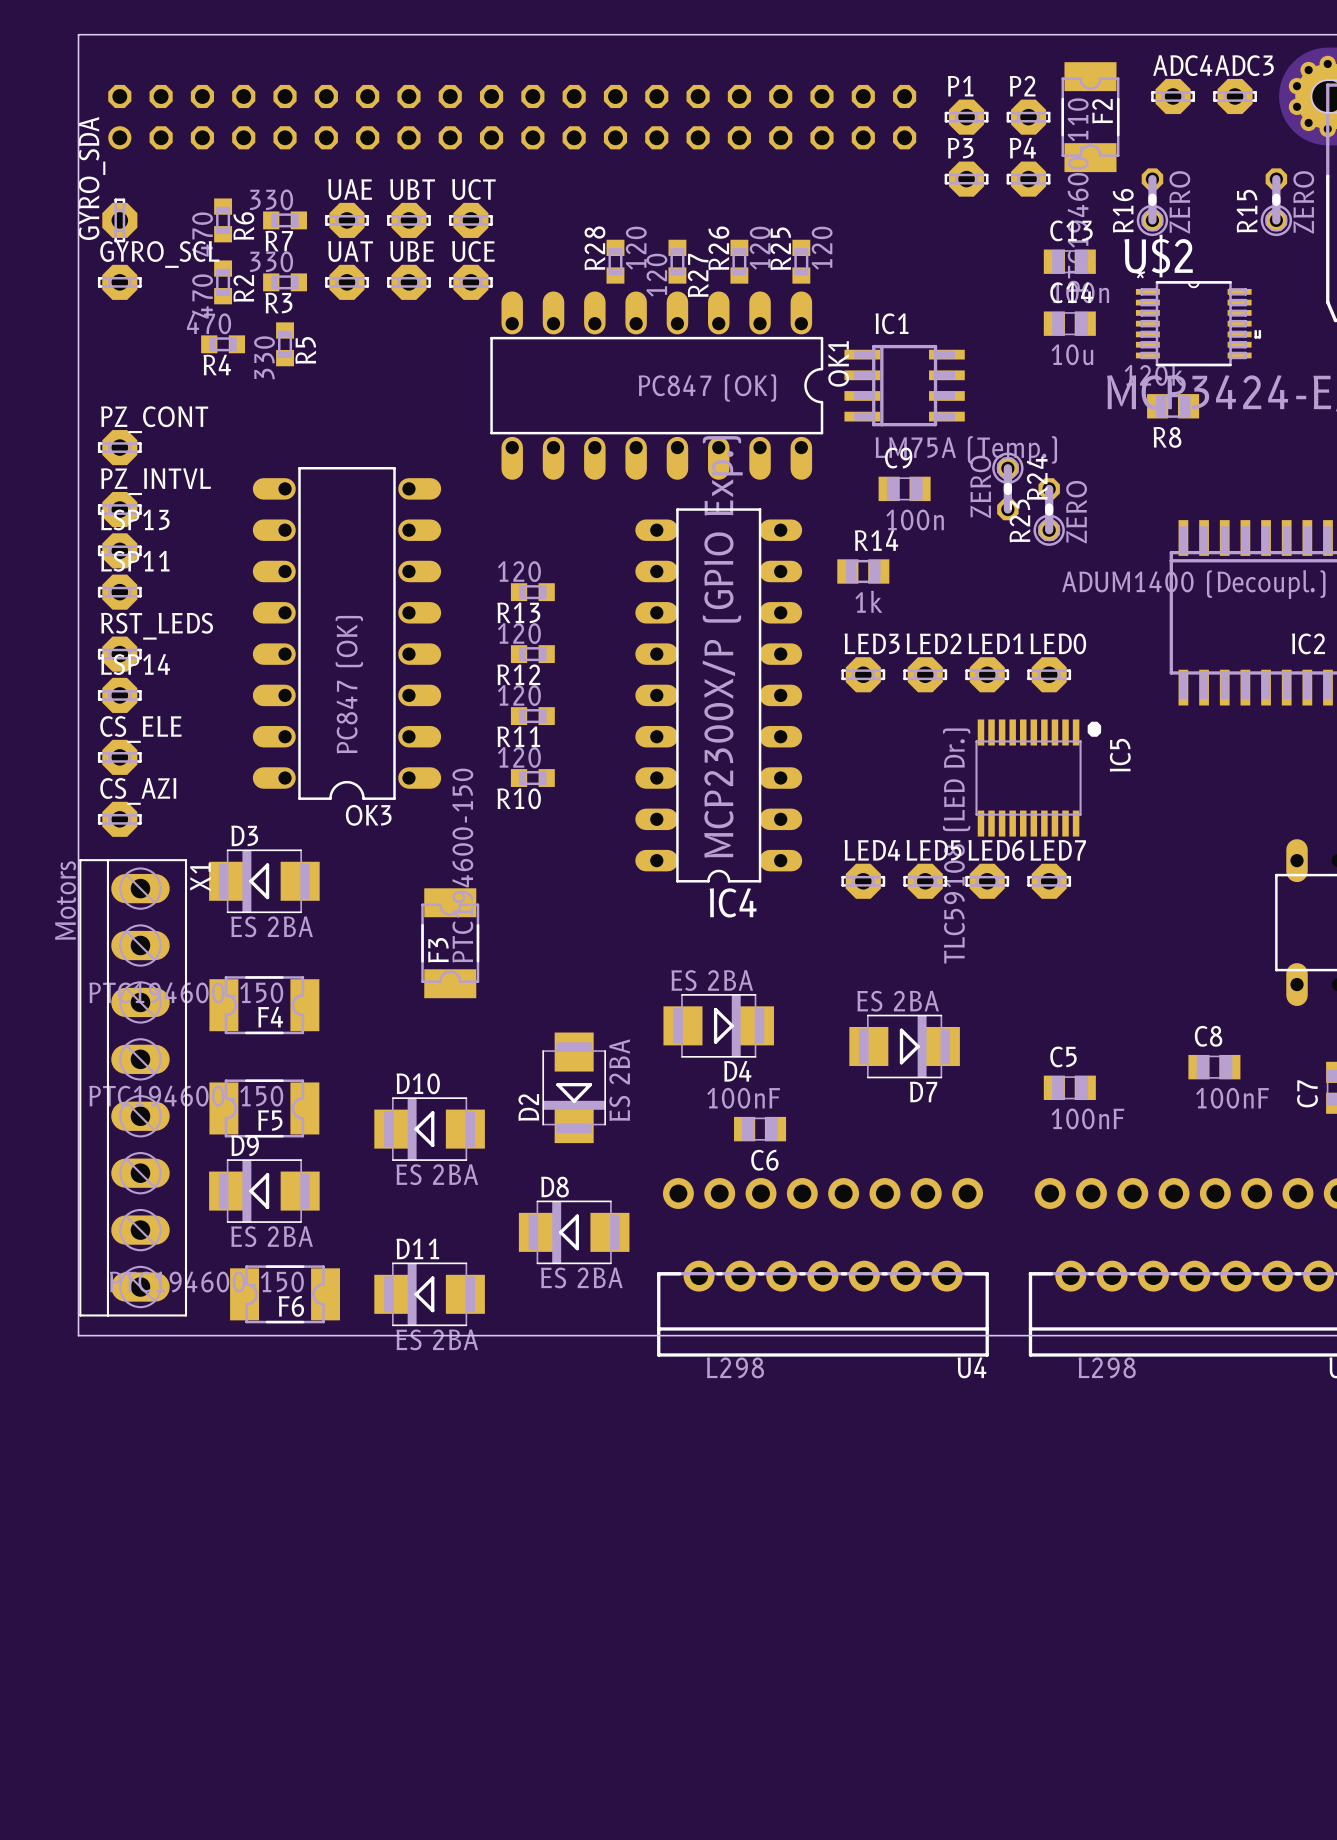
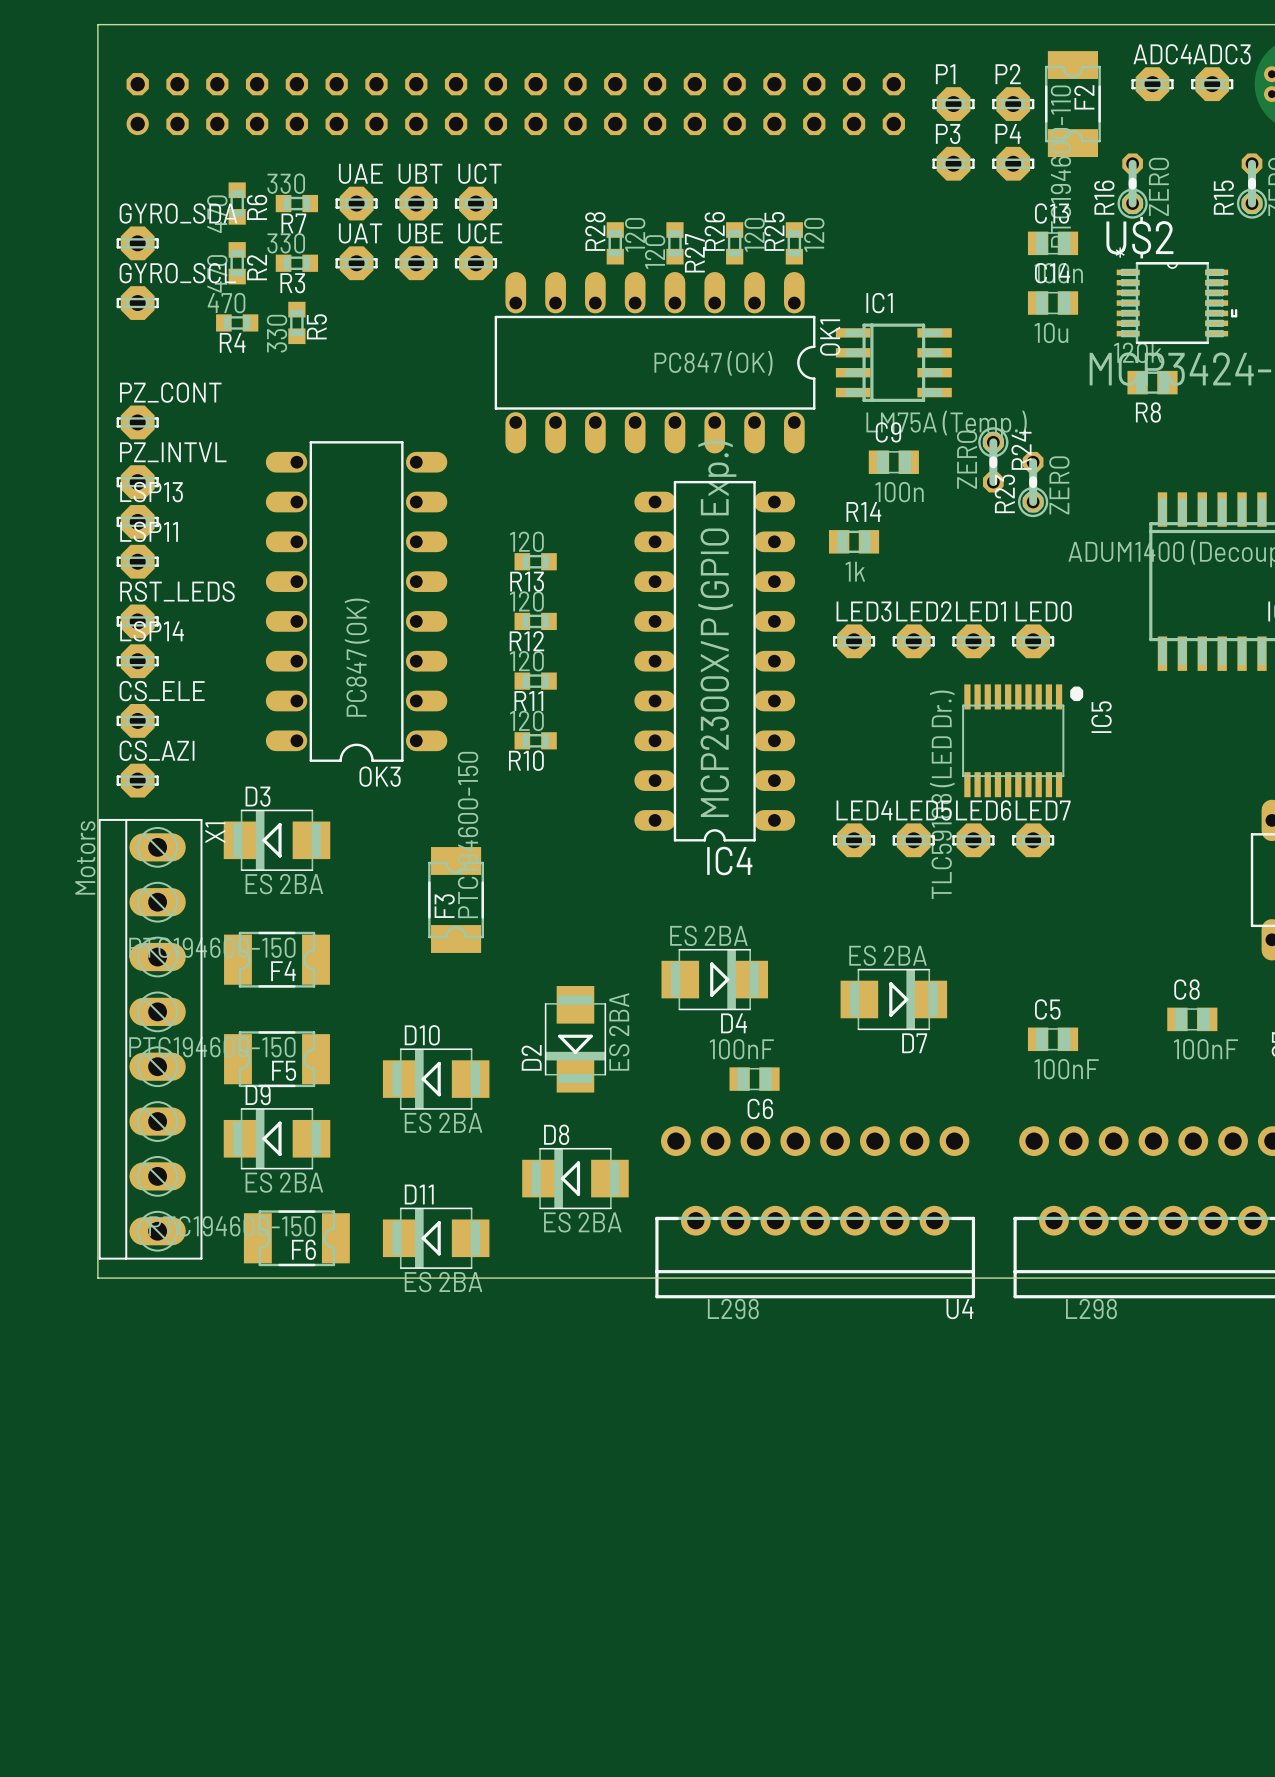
GYRO_SDA rotation: 0° (119, 220) -> 90° clockwise (137, 243)
GYRO_SDA position: (119, 220) -> (137, 243)
GYRO_SCL position: (119, 282) -> (137, 303)

